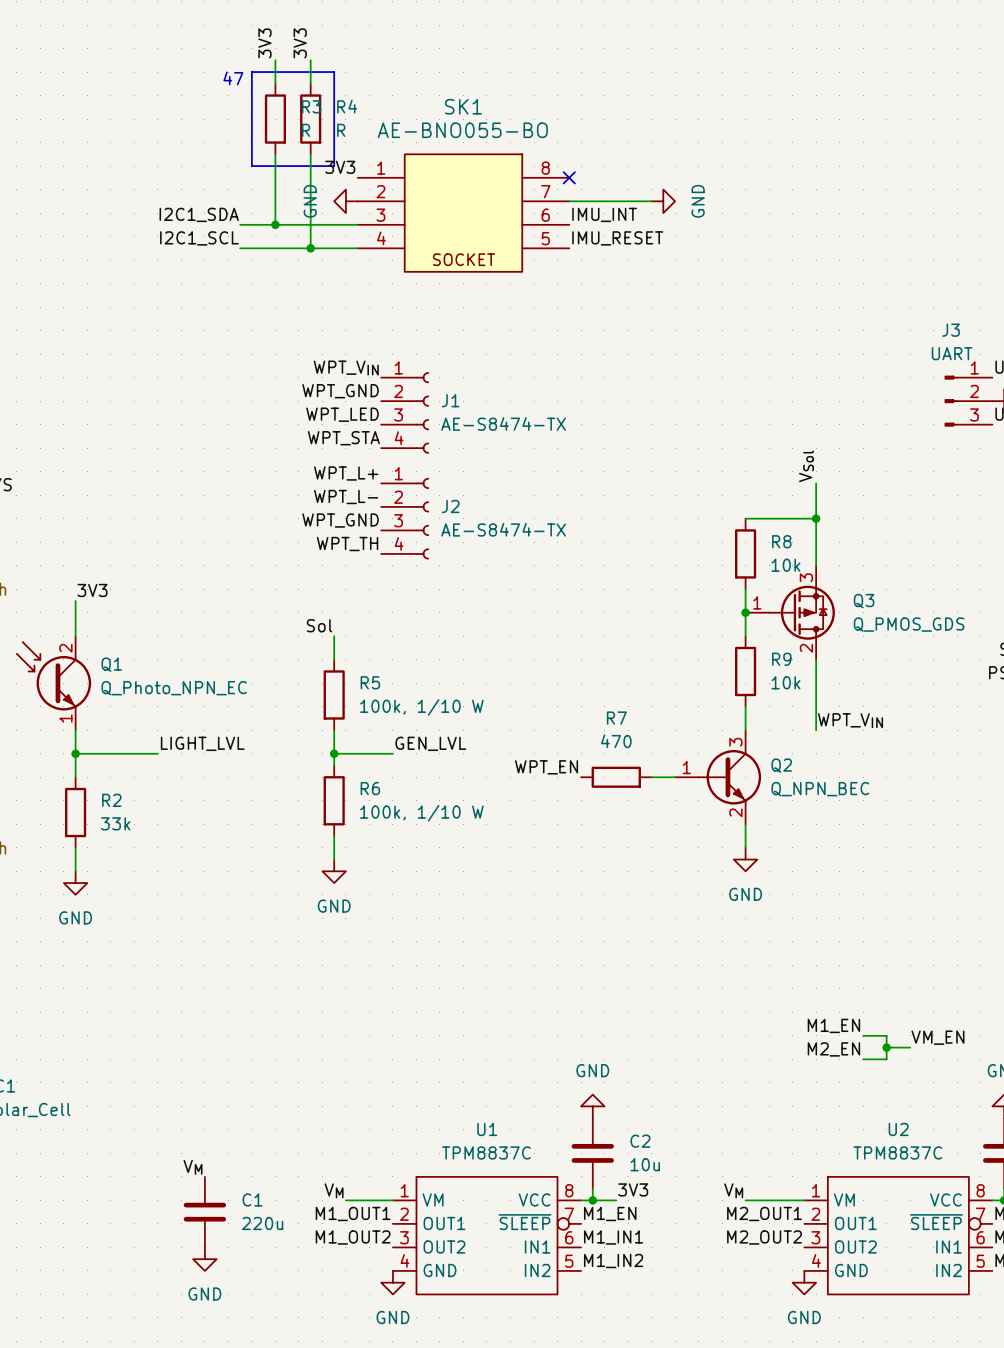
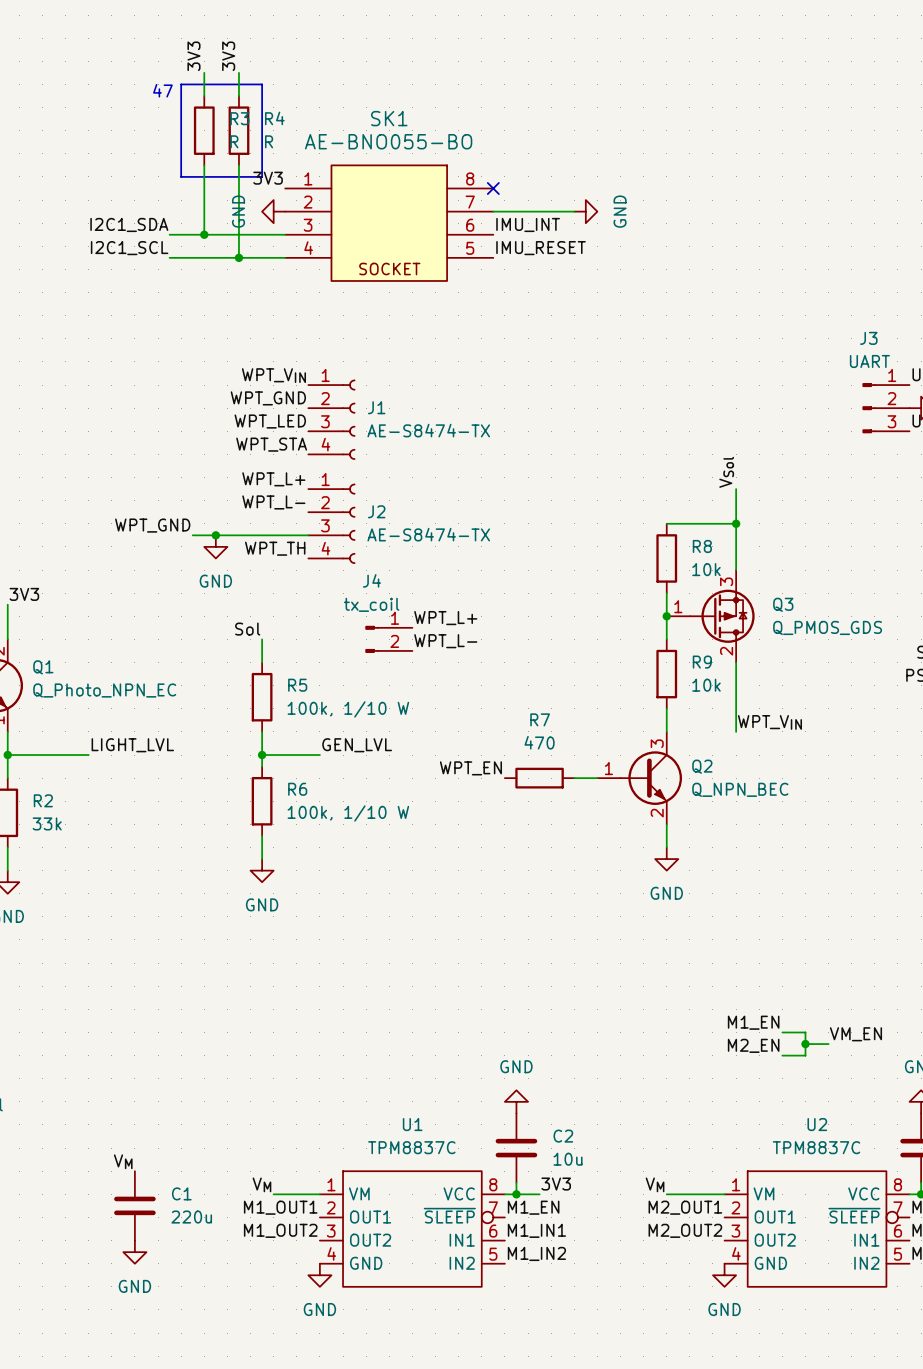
label position: WPT_GND (340, 520) -> WPT_GND (152, 525)
wire: none -> (192, 535) (308, 535)
junction: none -> (215, 535)
power symbol: none -> GND (215, 546)
label: none -> WPT_L+ (445, 618)
J4: none -> tx_coil (388, 639)
label: none -> WPT_L- (445, 641)

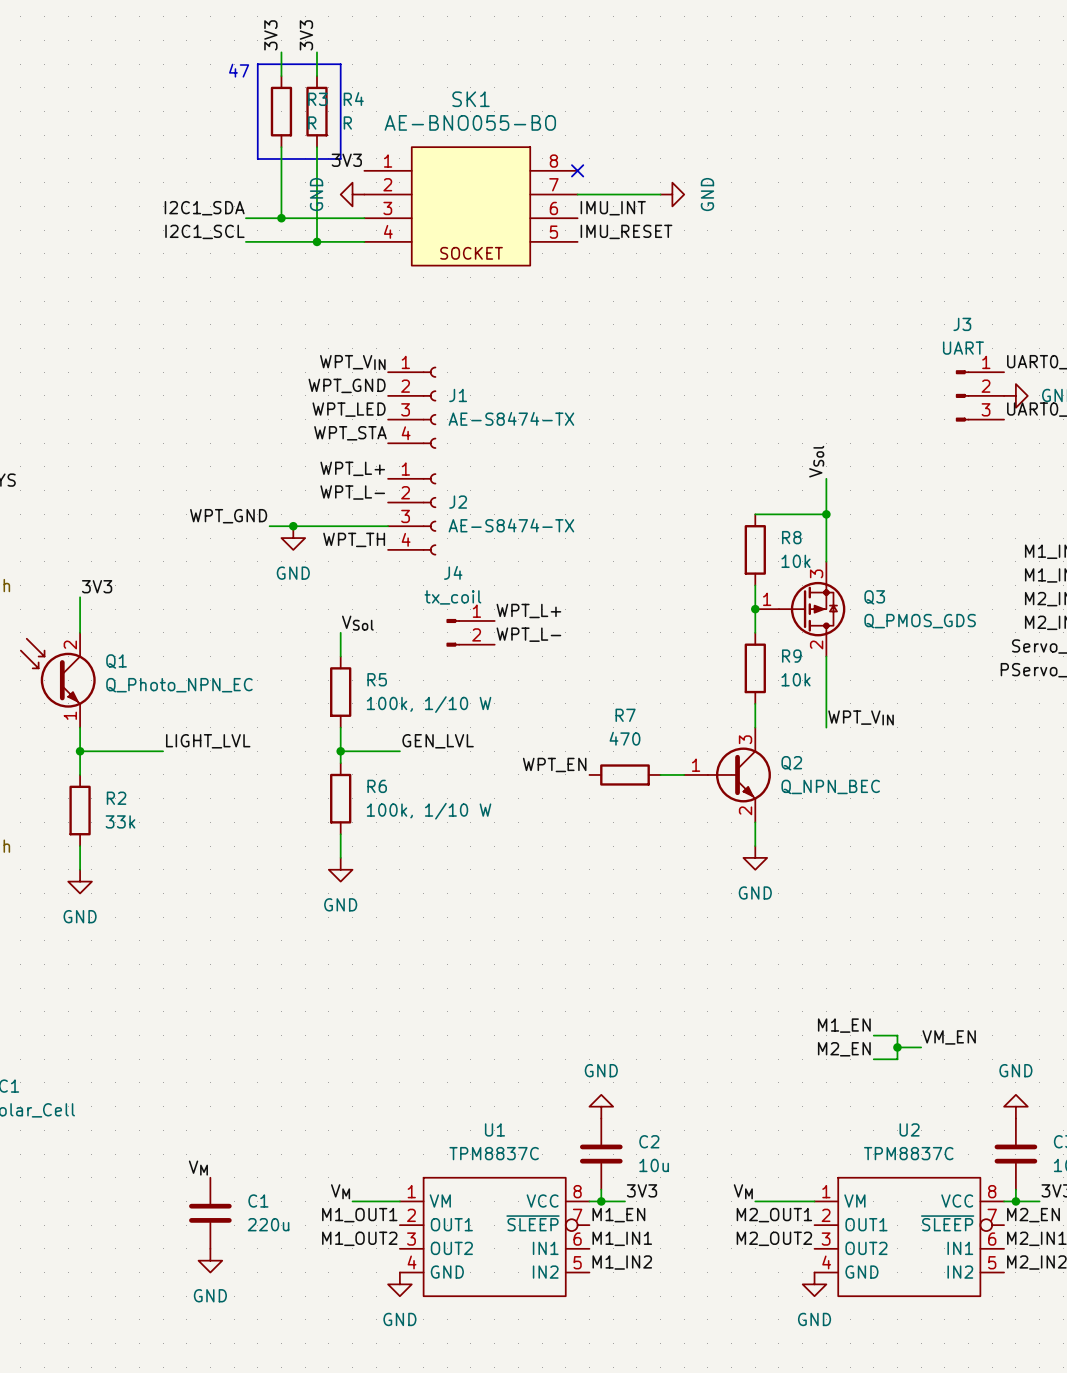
label: Sol (247, 629) -> VSol (357, 623)

